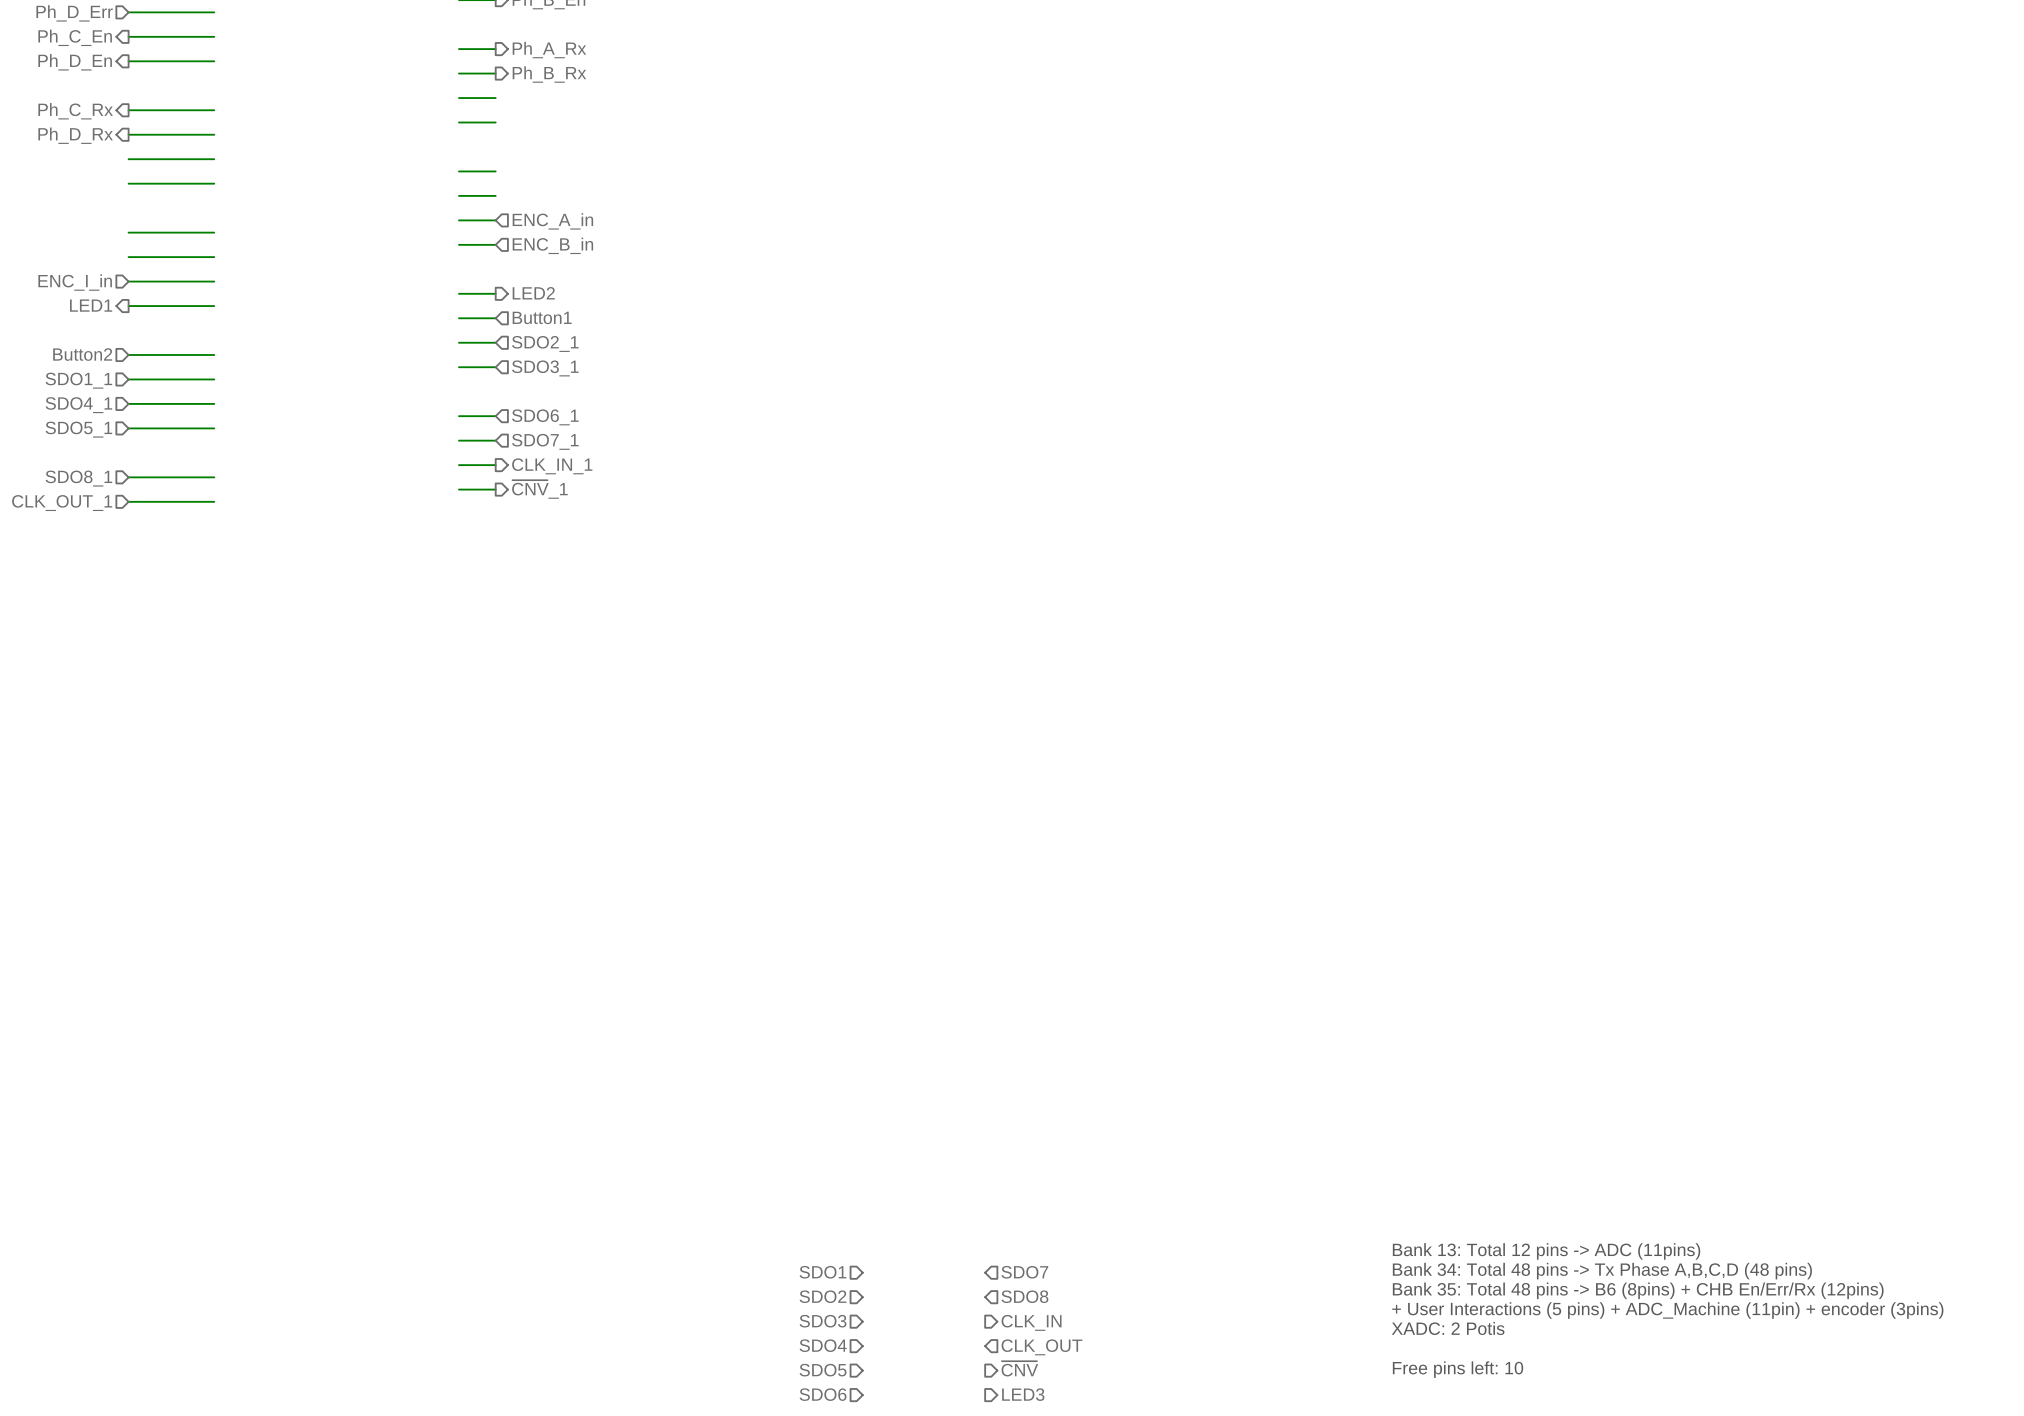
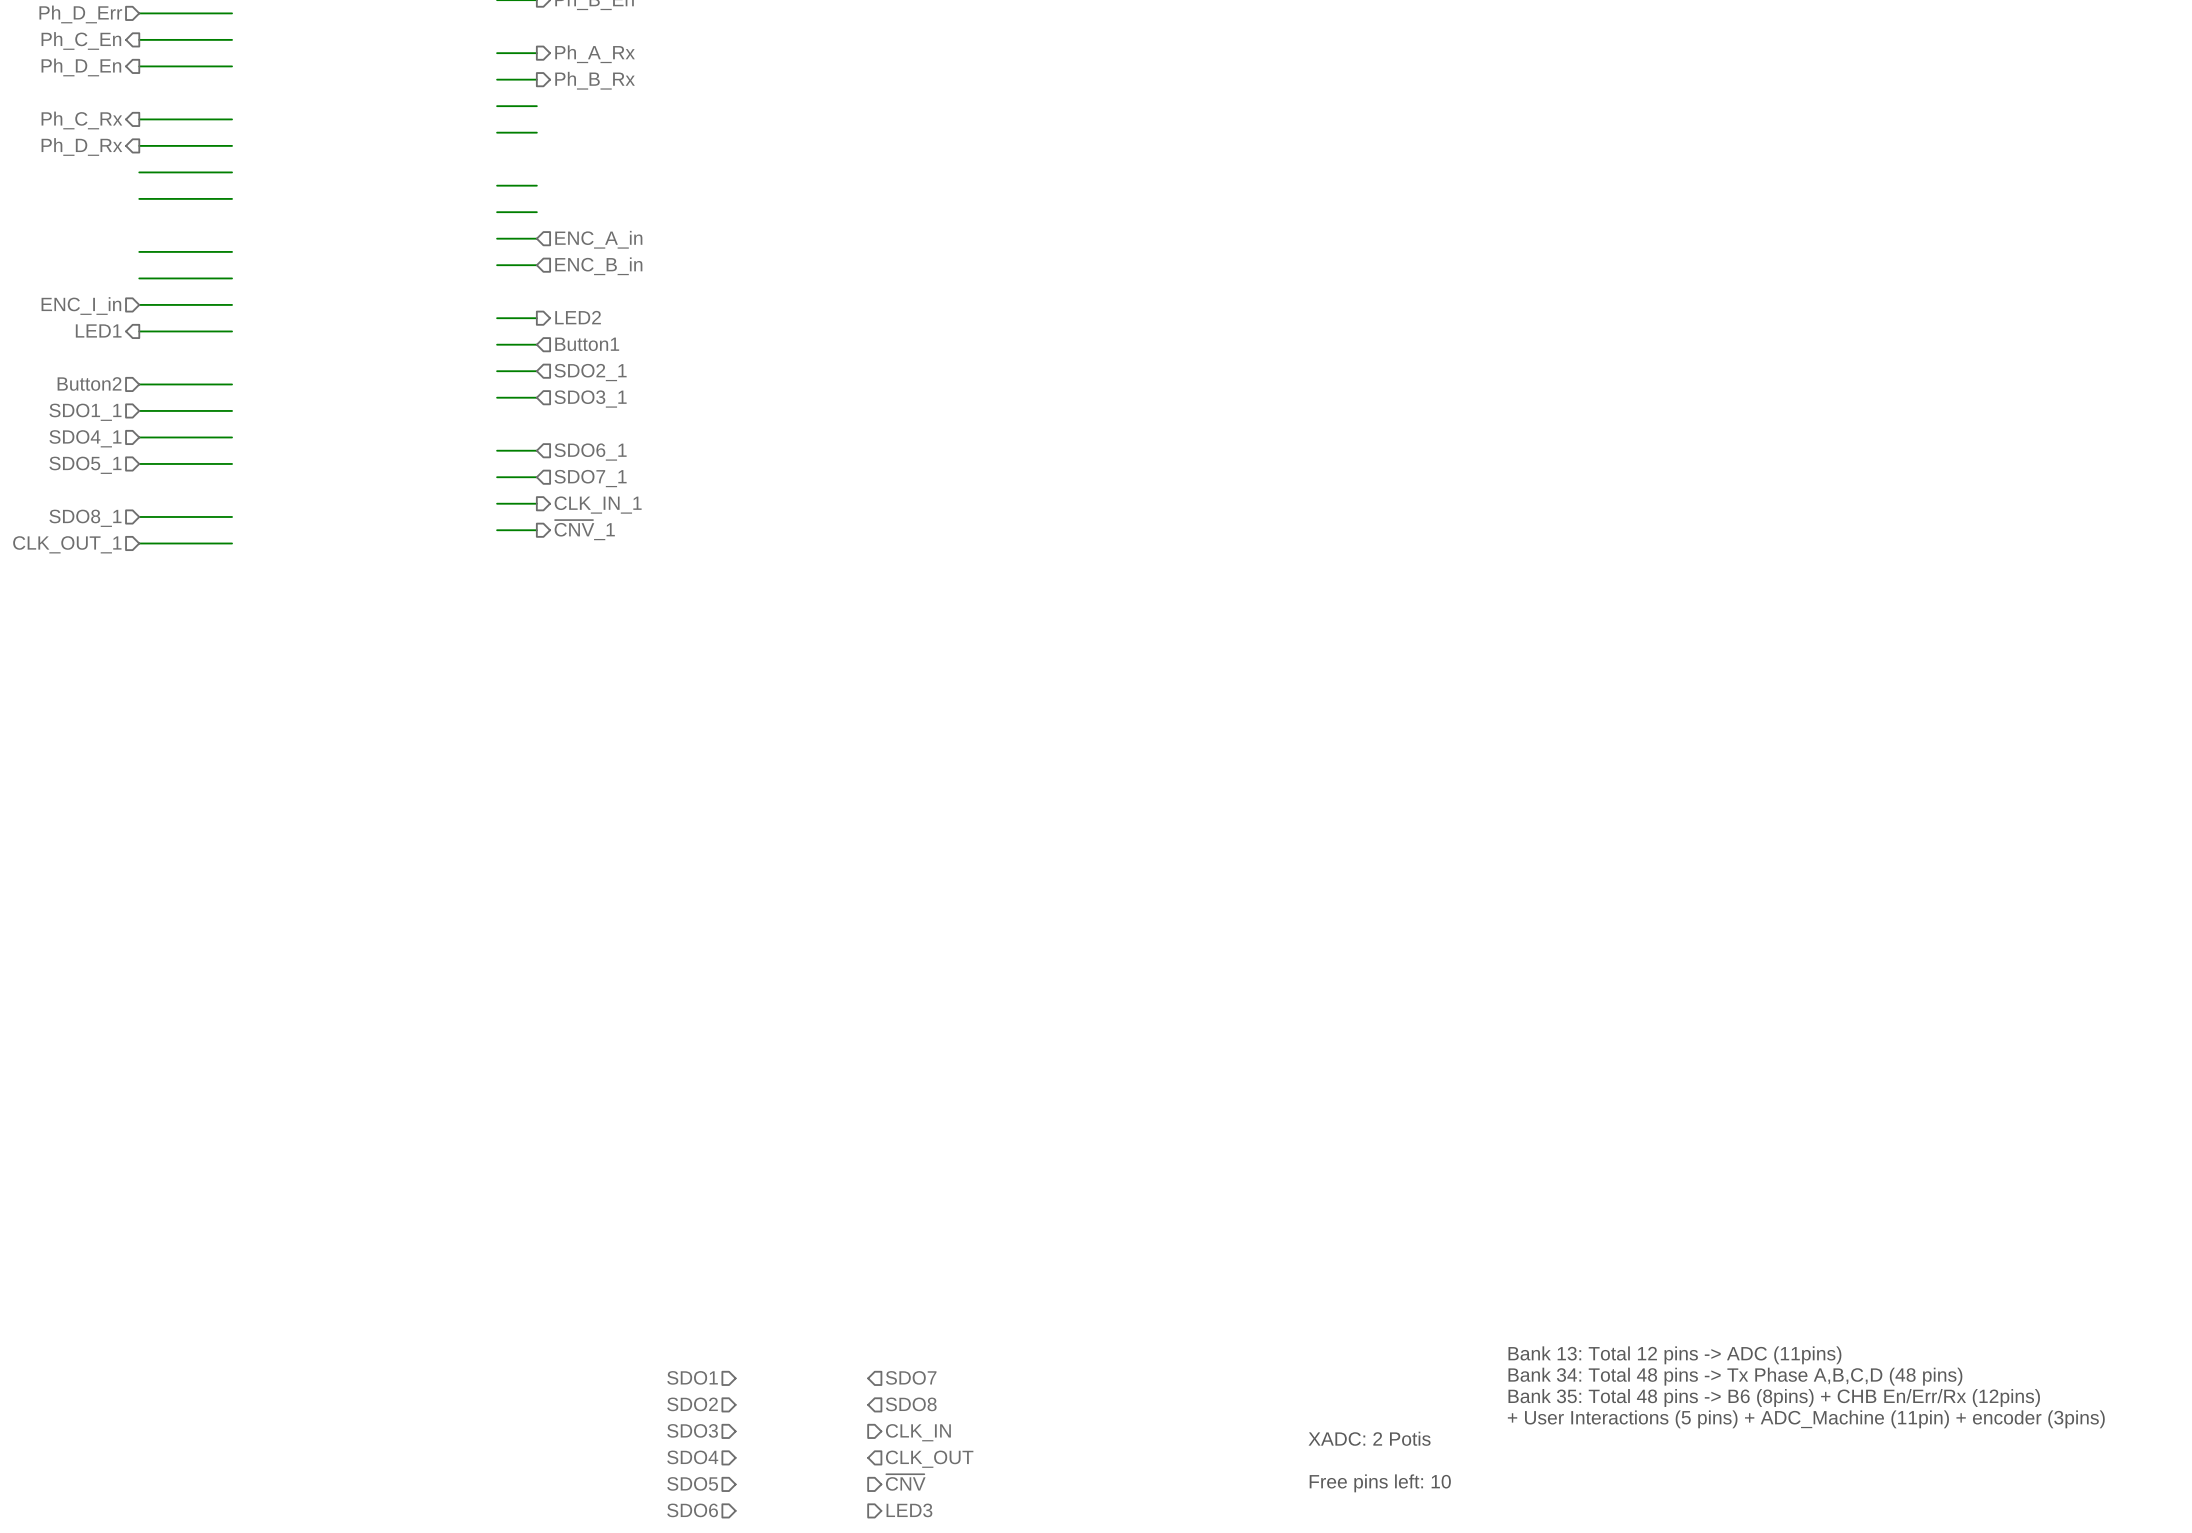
hierarchical label position: SDO1 (822, 1272) -> SDO1 (692, 1377)
hierarchical label position: SDO7 (1024, 1272) -> SDO7 (911, 1377)
hierarchical label position: SDO2 (822, 1296) -> SDO2 (692, 1404)
hierarchical label position: SDO8 (1024, 1296) -> SDO8 (911, 1404)
hierarchical label position: SDO3 (823, 1321) -> SDO3 (692, 1430)
hierarchical label position: CLK_IN (1031, 1322) -> CLK_IN (918, 1432)
text position: XADC: 2 Potis (1448, 1328) -> XADC: 2 Potis (1369, 1438)
hierarchical label position: SDO4 (823, 1345) -> SDO4 (692, 1457)
hierarchical label position: CLK_OUT (1041, 1347) -> CLK_OUT (929, 1459)
hierarchical label position: ~{CNV} (1019, 1368) -> ~{CNV} (905, 1482)
text position: Free pins left: 10 (1458, 1369) -> Free pins left: 10 (1380, 1483)
hierarchical label position: SDO5 (823, 1370) -> SDO5 (692, 1483)
hierarchical label position: SDO6 (823, 1394) -> SDO6 (692, 1510)
hierarchical label position: LED3 (1023, 1394) -> LED3 (909, 1510)

